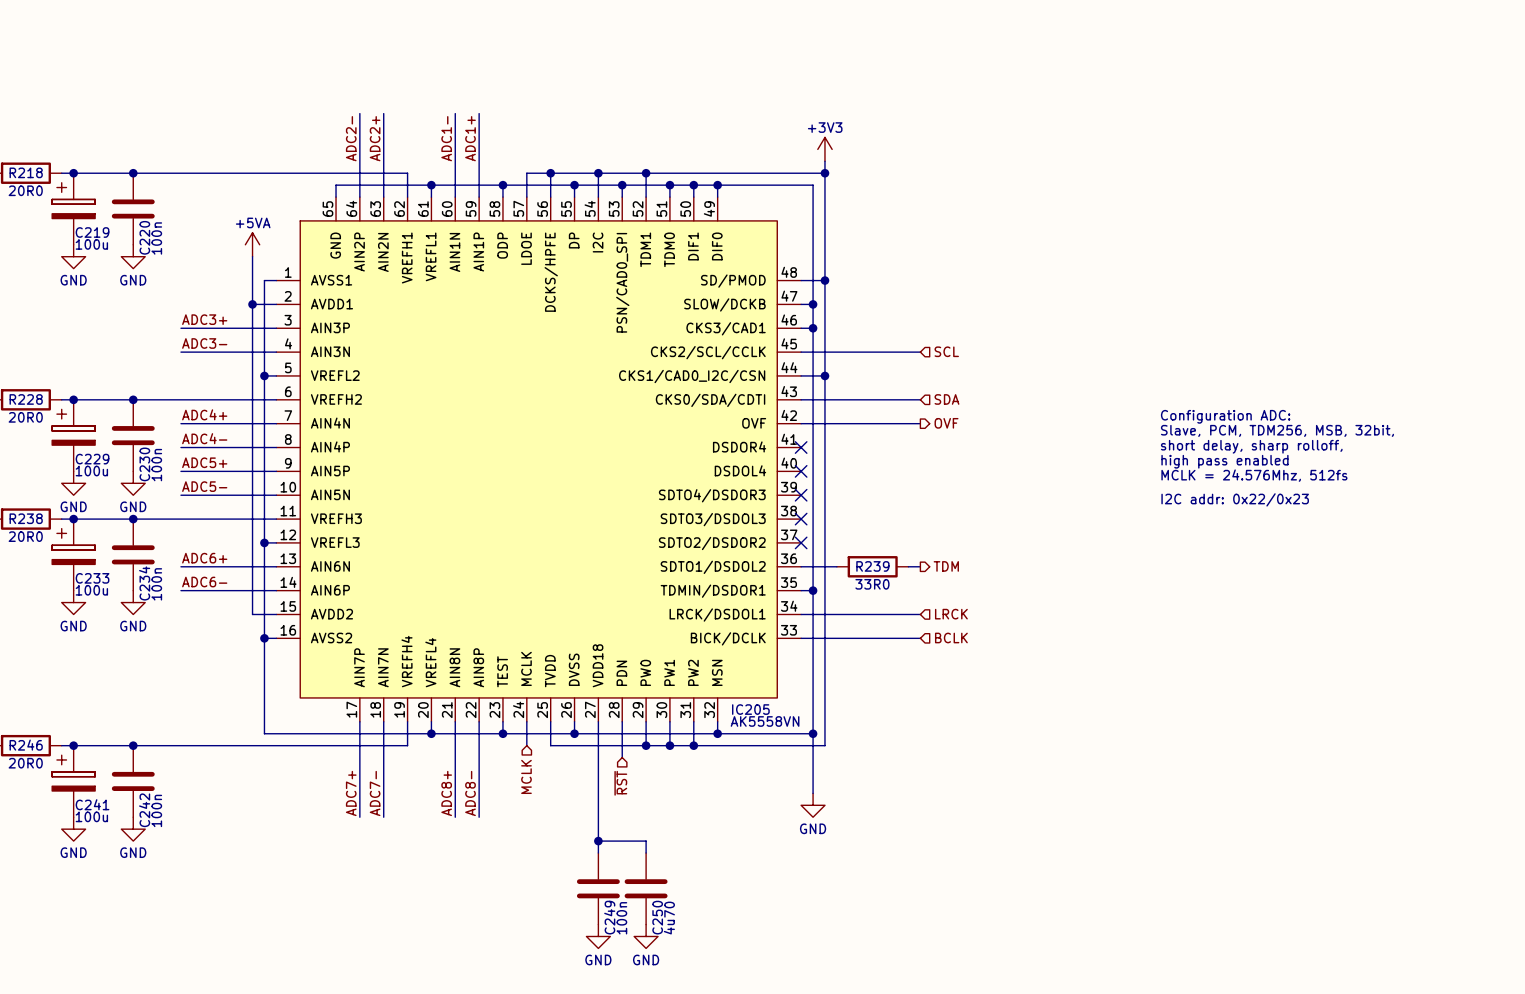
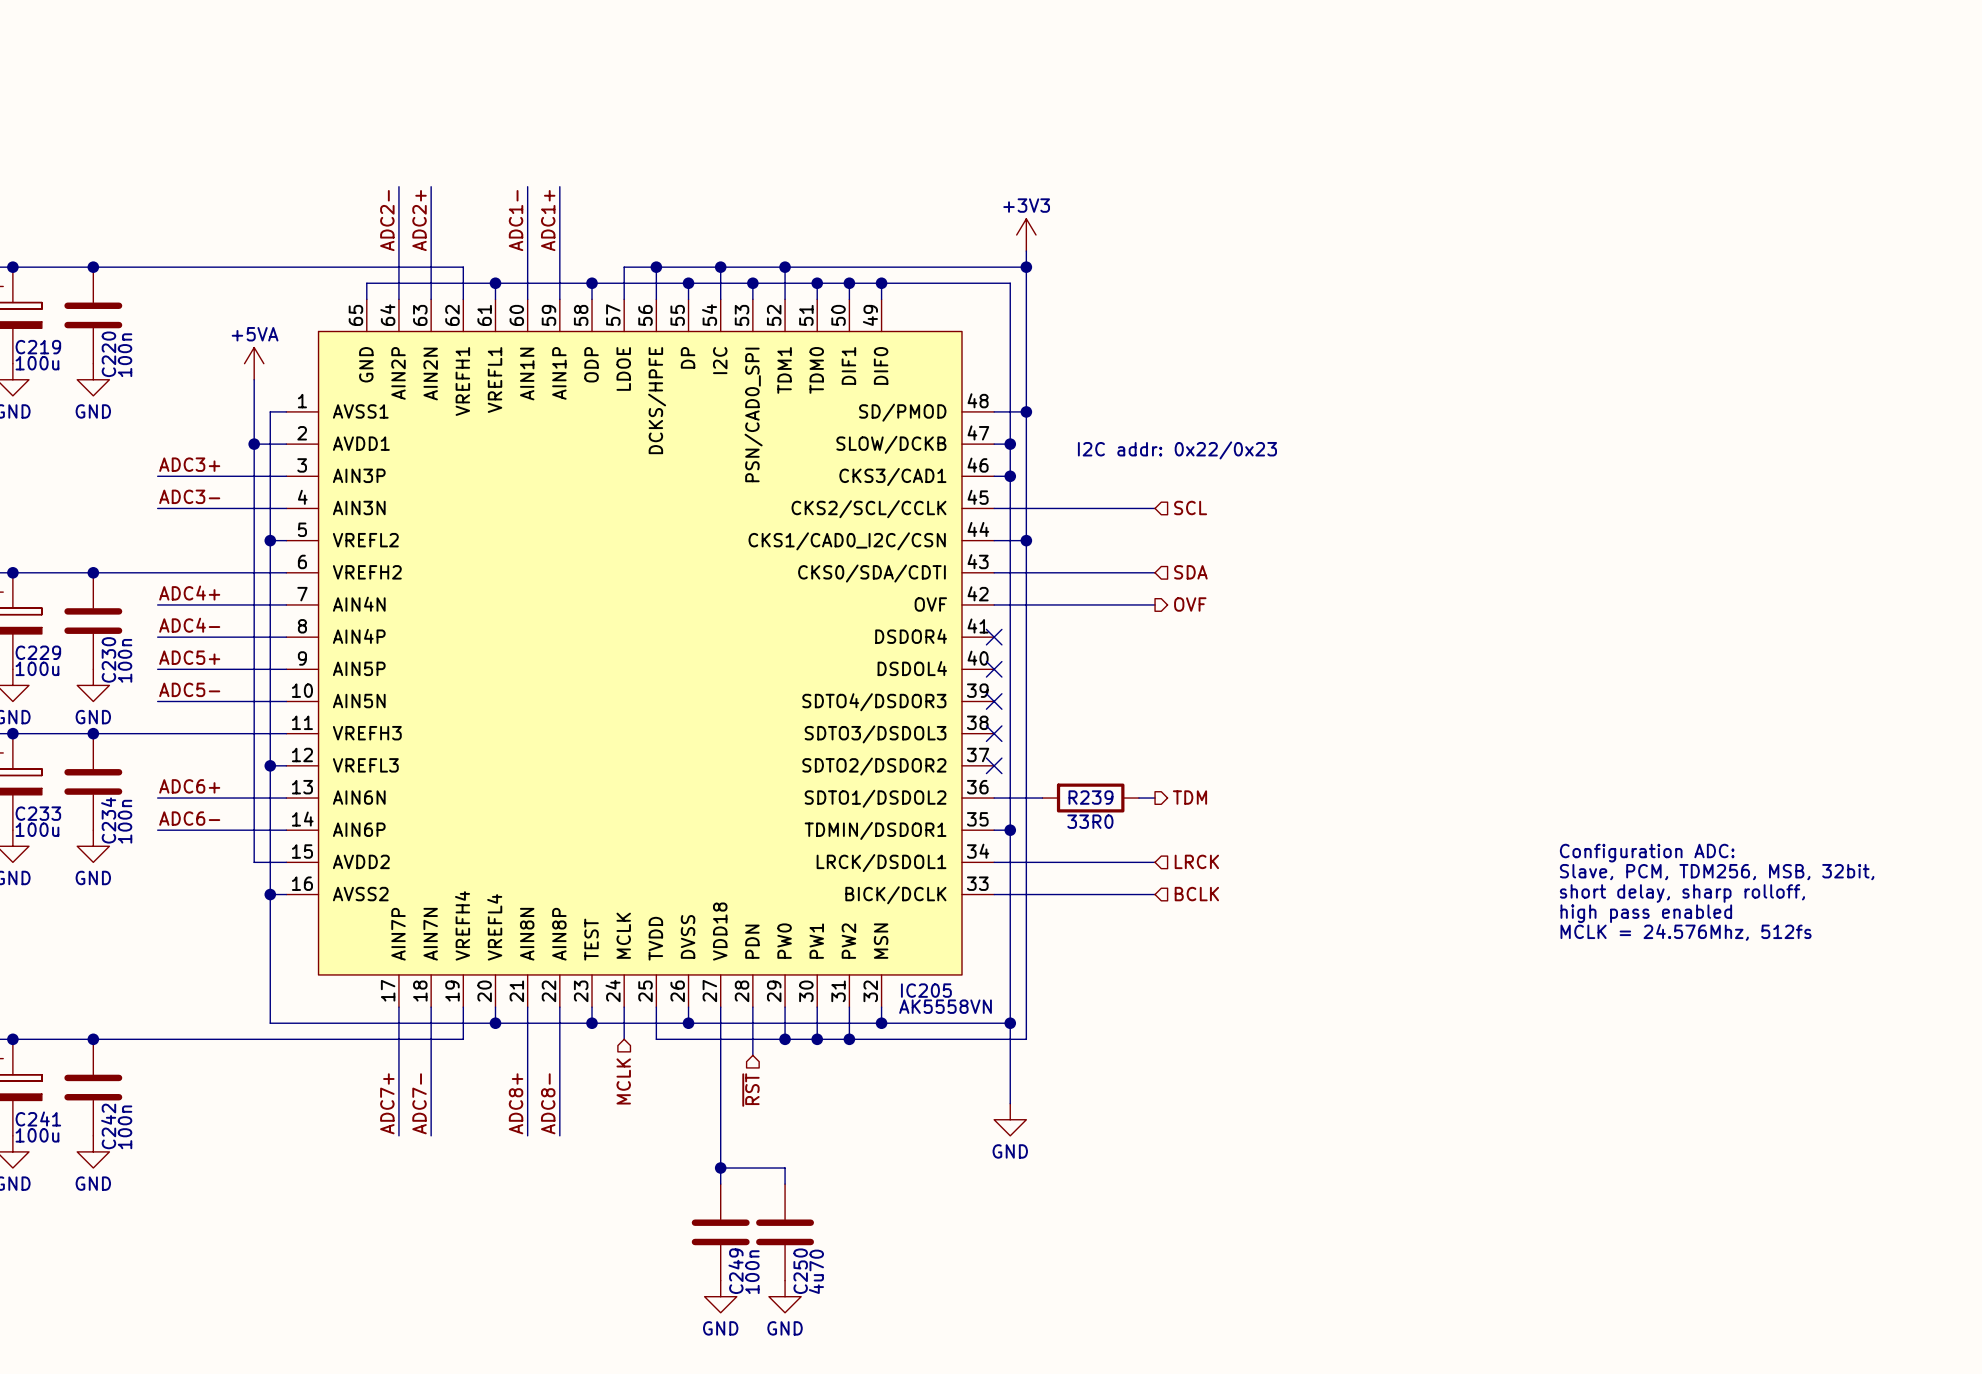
text: none -> I2C addr: 0x22/0x23 (1177, 450)
text position: Configuration ADC: (1225, 416) -> Configuration ADC: (1647, 853)
text position: Slave, PCM, TDM256, MSB, 32bit, (1277, 430) -> Slave, PCM, TDM256, MSB, 32bit, (1717, 872)
text position: short delay, sharp rolloff, (1251, 446) -> short delay, sharp rolloff, (1682, 893)
text position: high pass enabled (1224, 461) -> high pass enabled (1646, 913)
text position: MCLK = 24.576Mhz, 512fs (1254, 475) -> MCLK = 24.576Mhz, 512fs (1686, 932)
text: I2C addr: 0x22/0x23 (1235, 499) -> none

